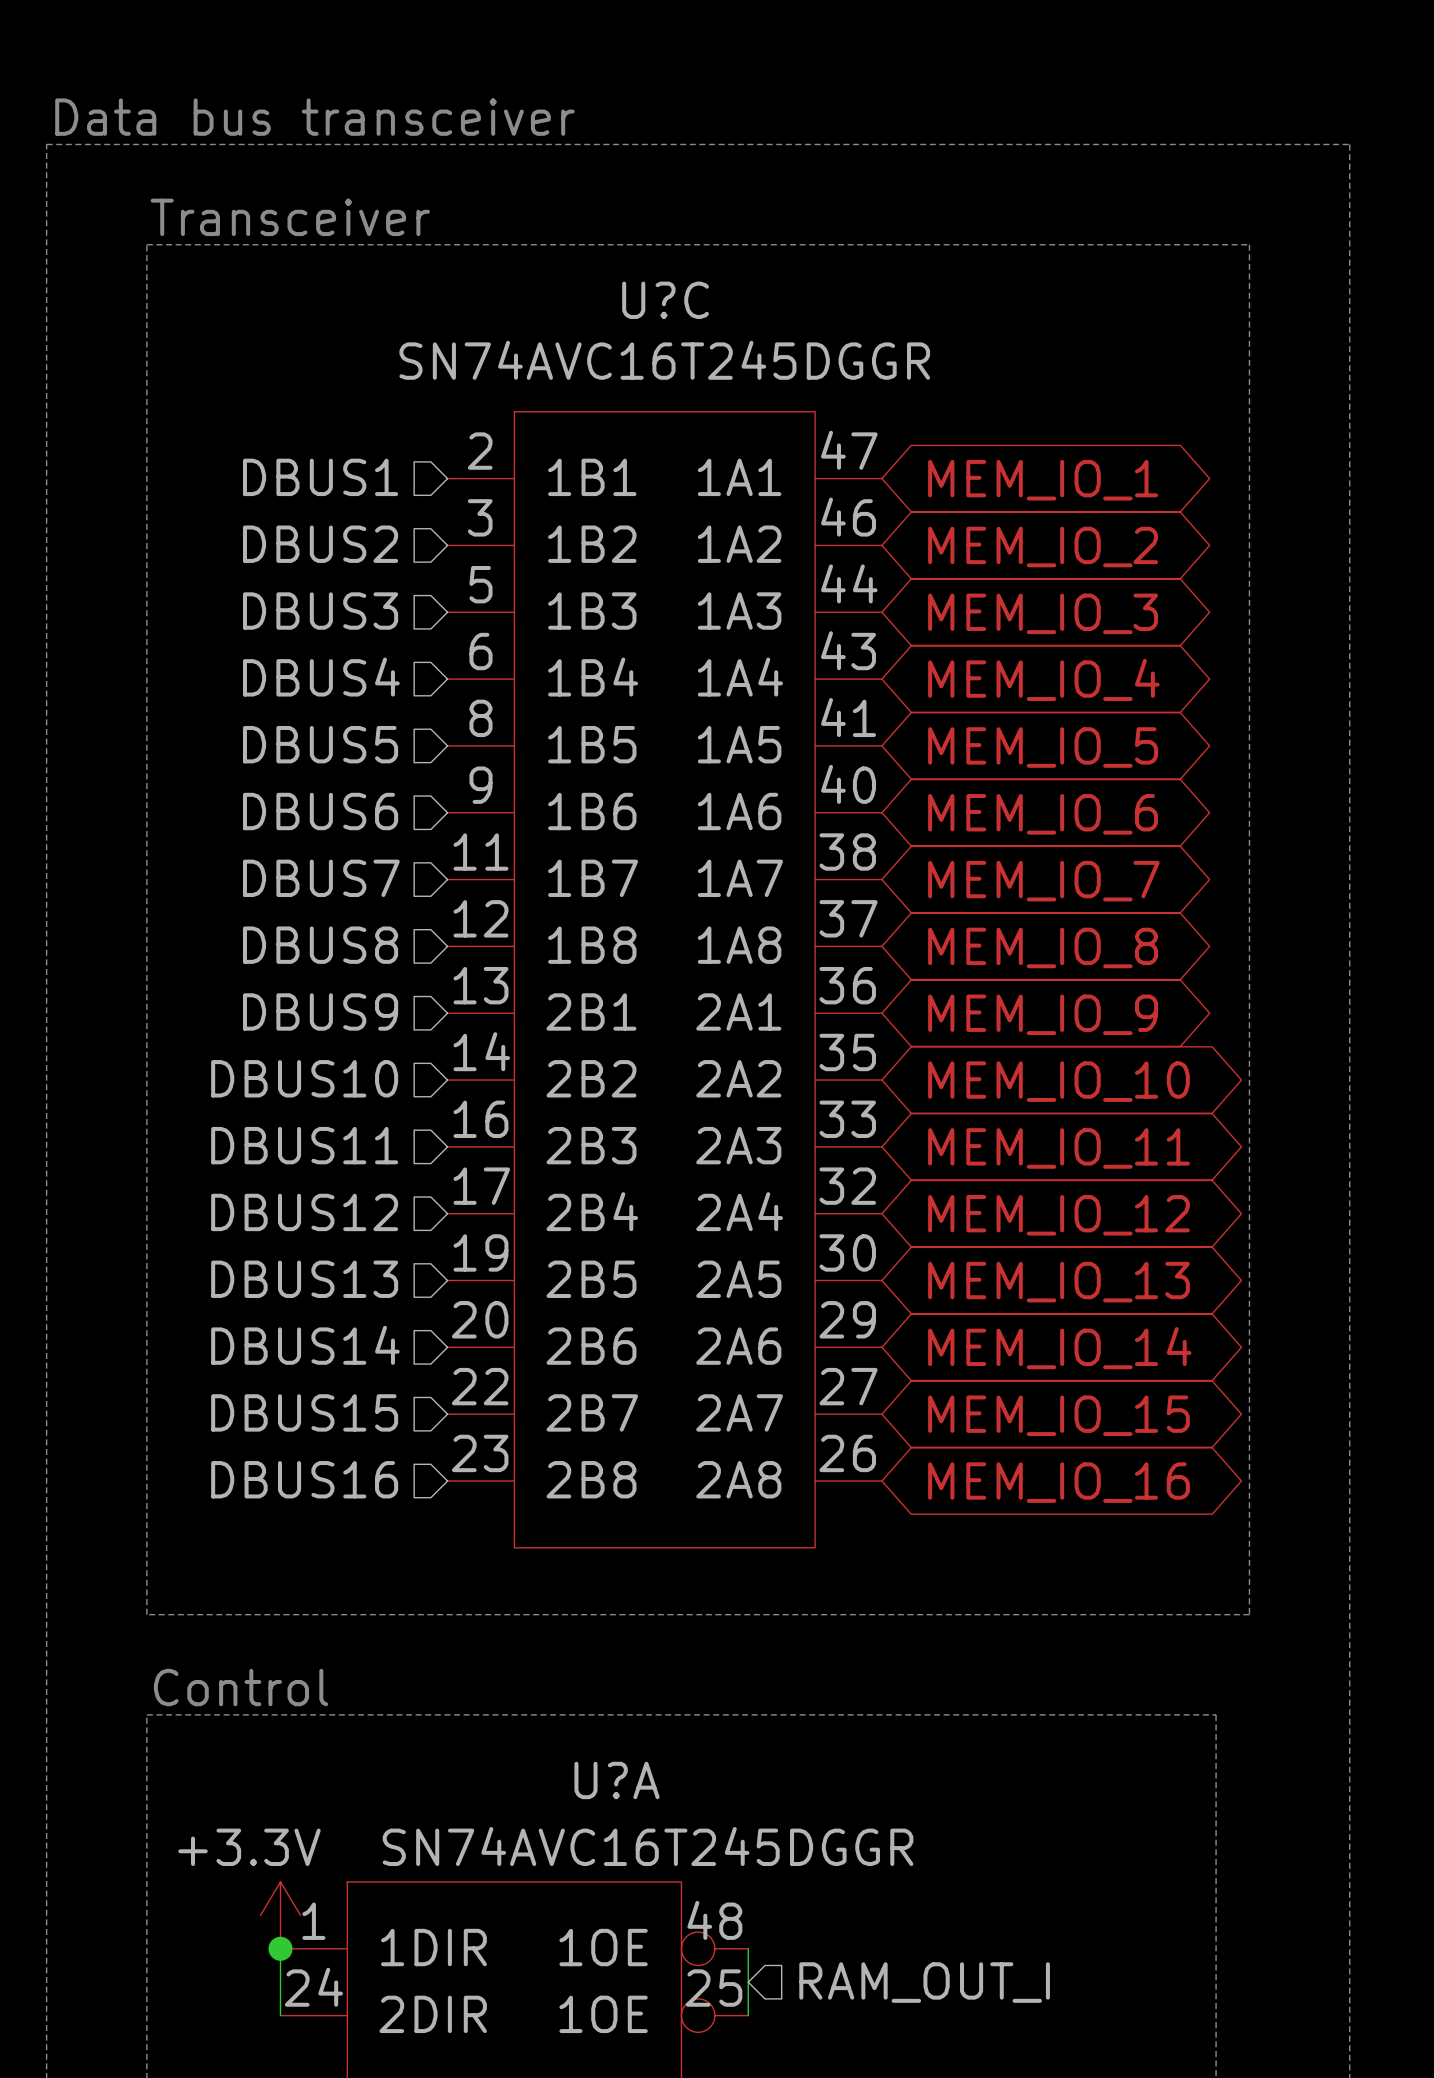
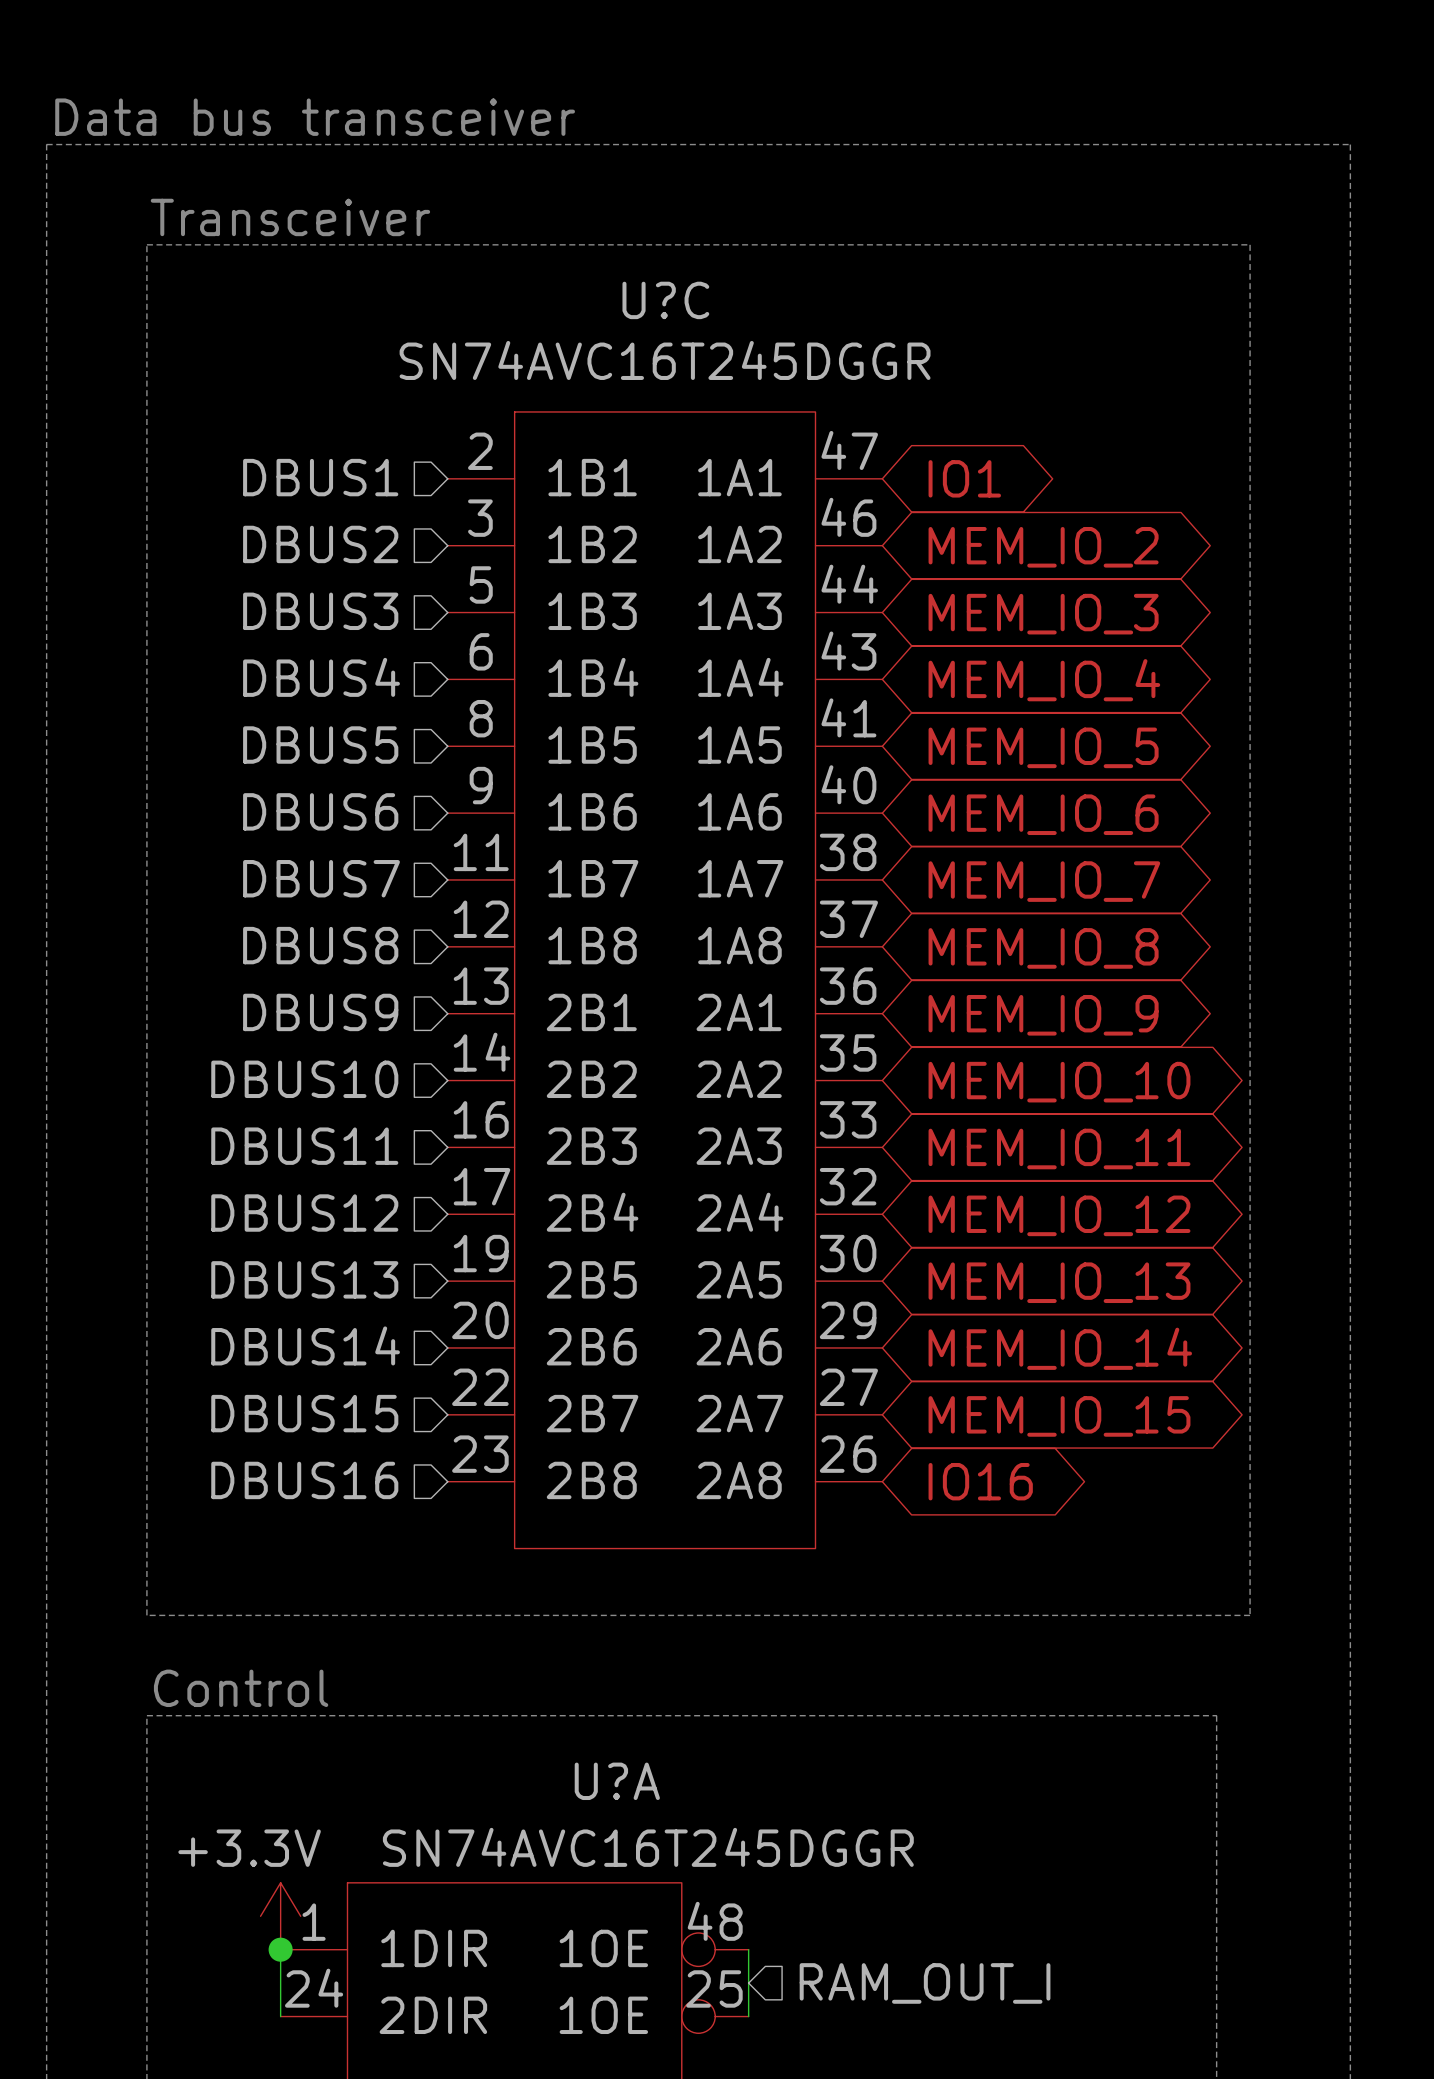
global label: MEM_IO_1 (1043, 480) -> IO1 (964, 478)
global label: MEM_IO_16 (1059, 1482) -> IO16 (980, 1481)

